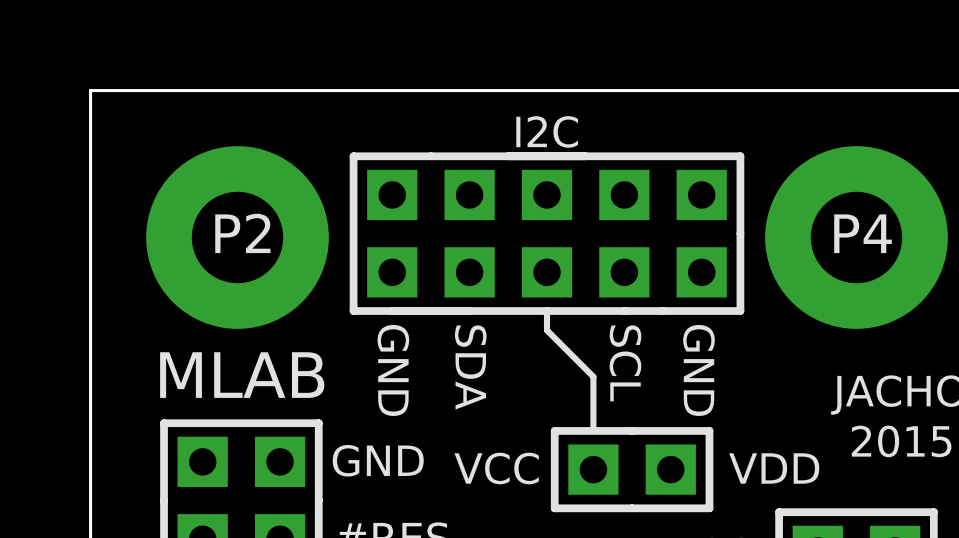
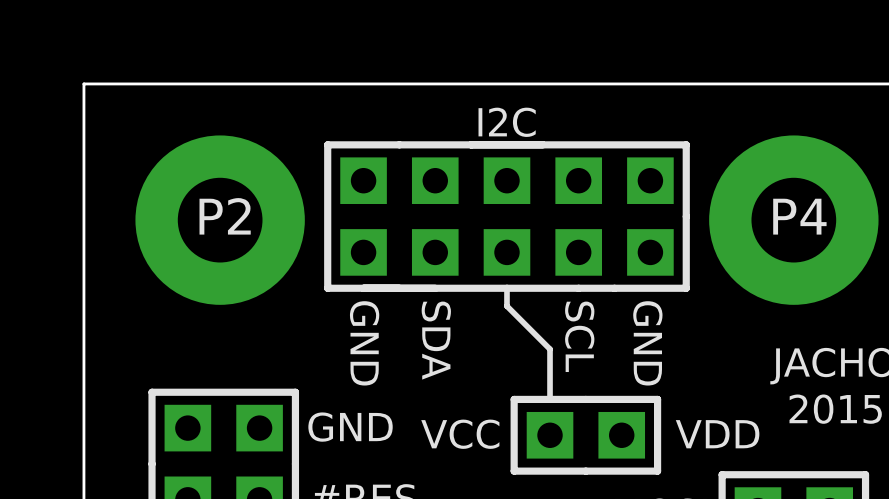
text: MLAB (242, 375) -> none

